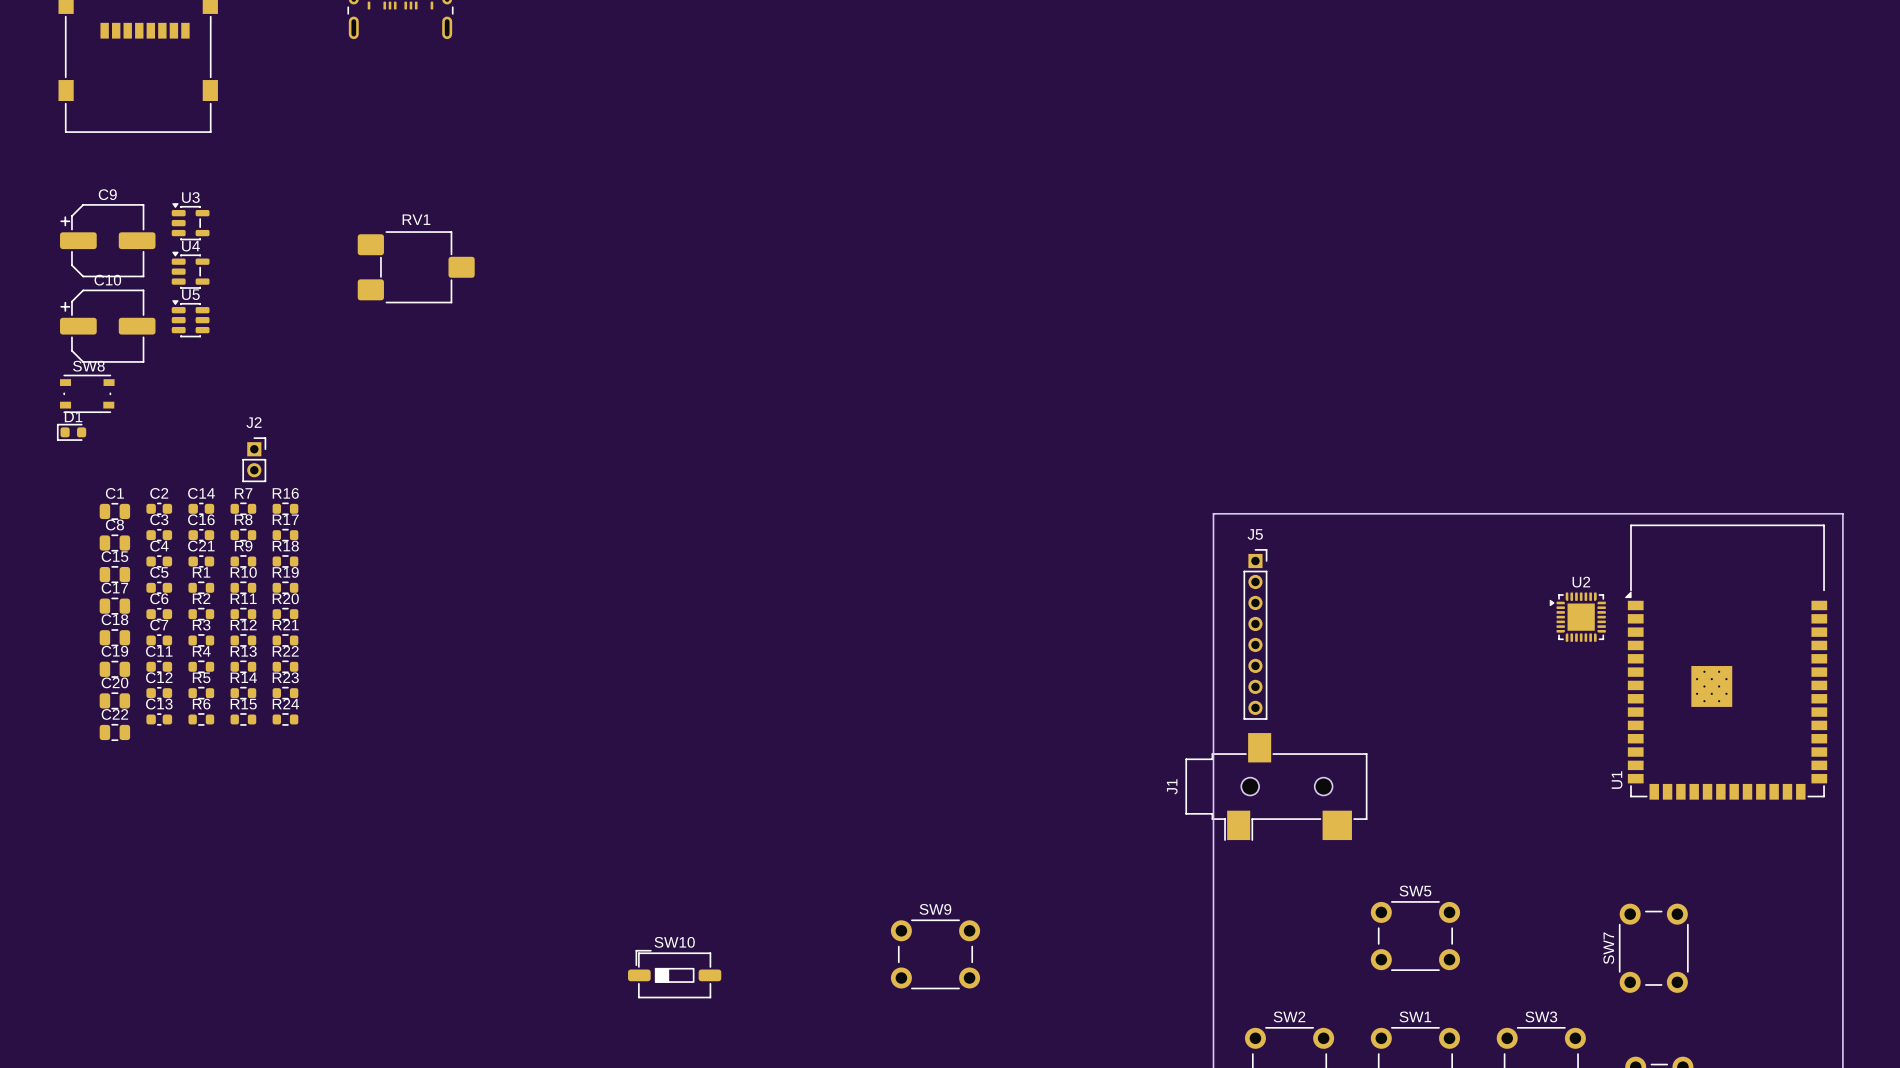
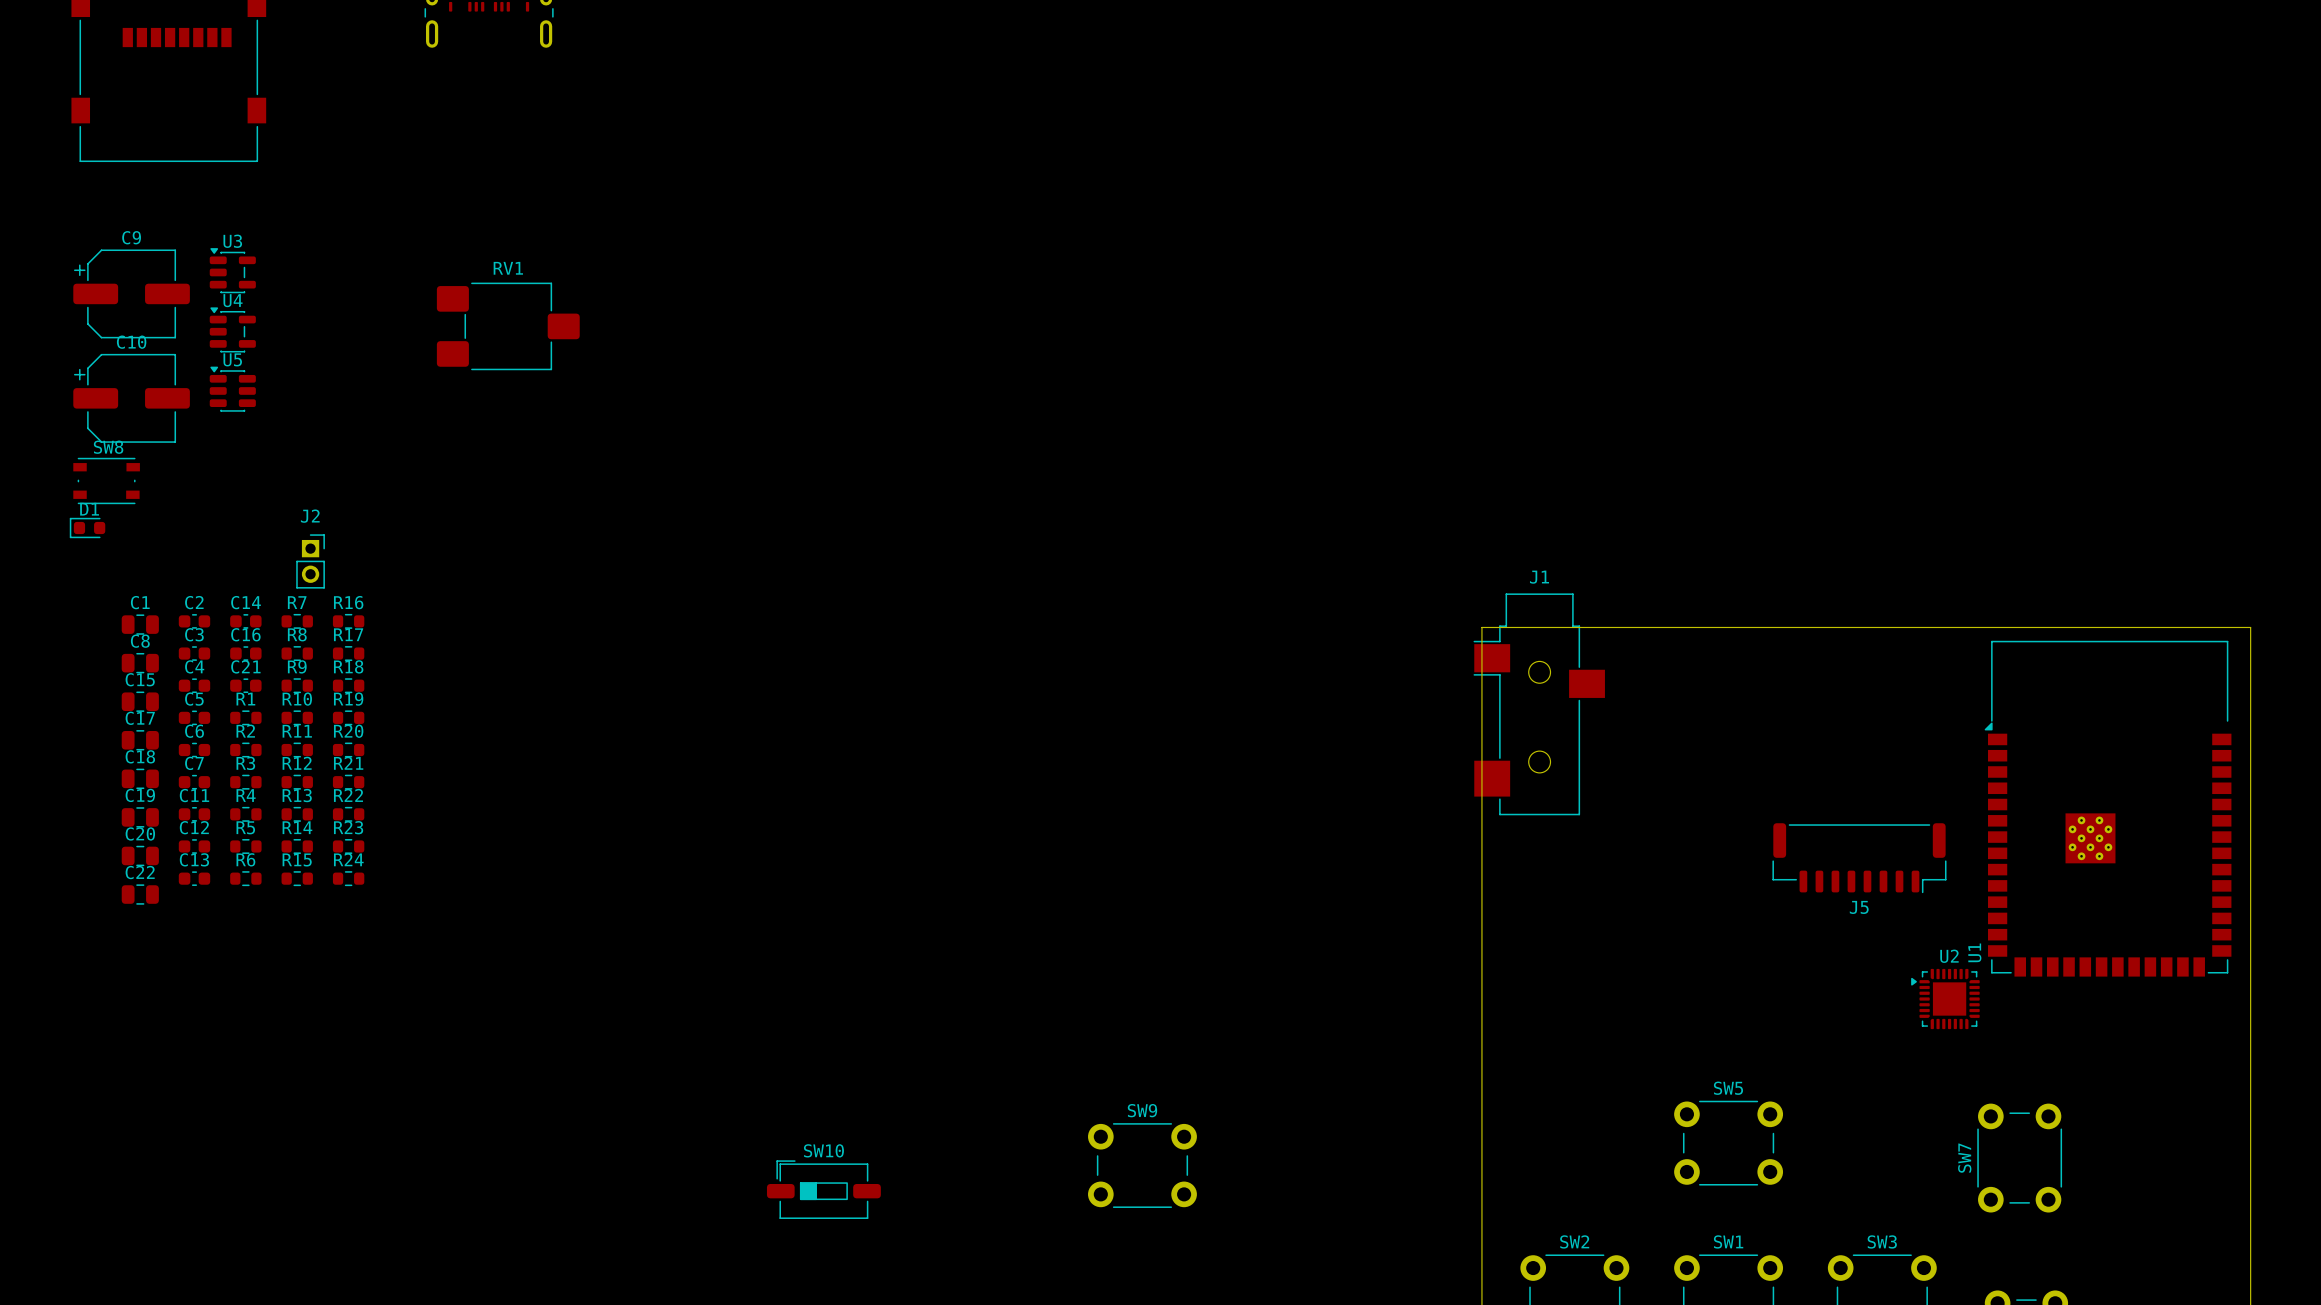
J5 name position: J5 (1255, 534) -> J5 (1859, 907)
J5 footprint: [1243, 549, 1268, 720] -> [1772, 823, 1947, 894]
U2 position: (1577, 617) -> (1945, 999)
J1 rotation: 0° (1276, 786) -> 90° clockwise (1539, 704)
J1 position: (1276, 786) -> (1539, 704)

